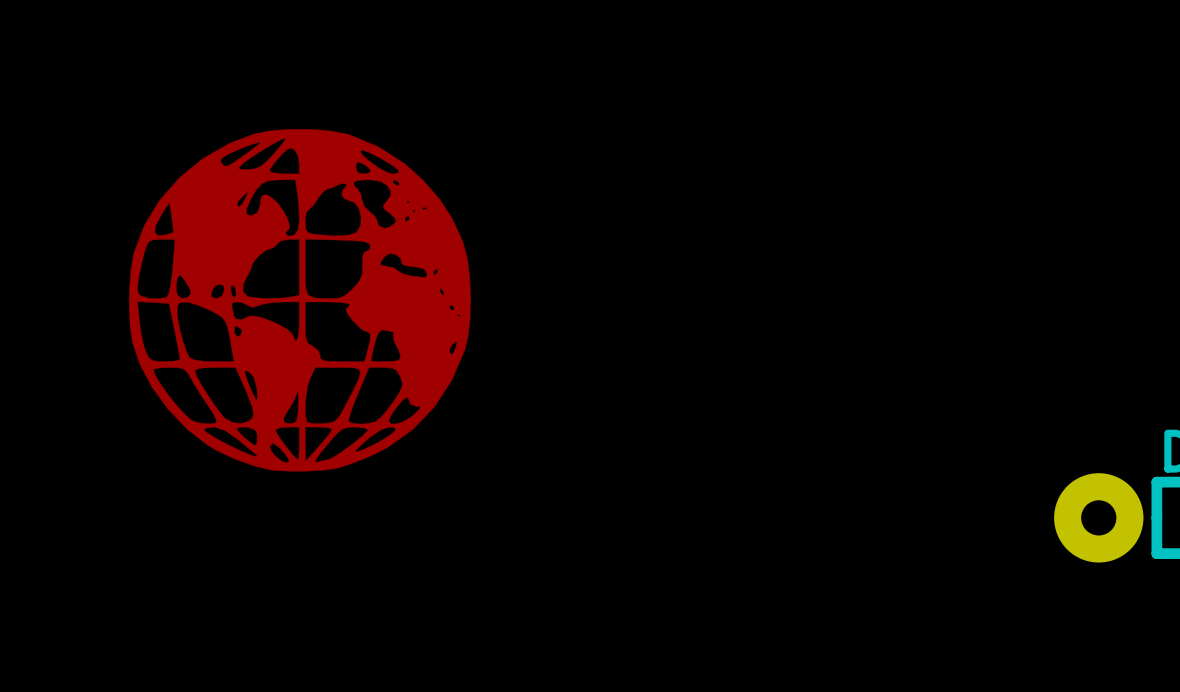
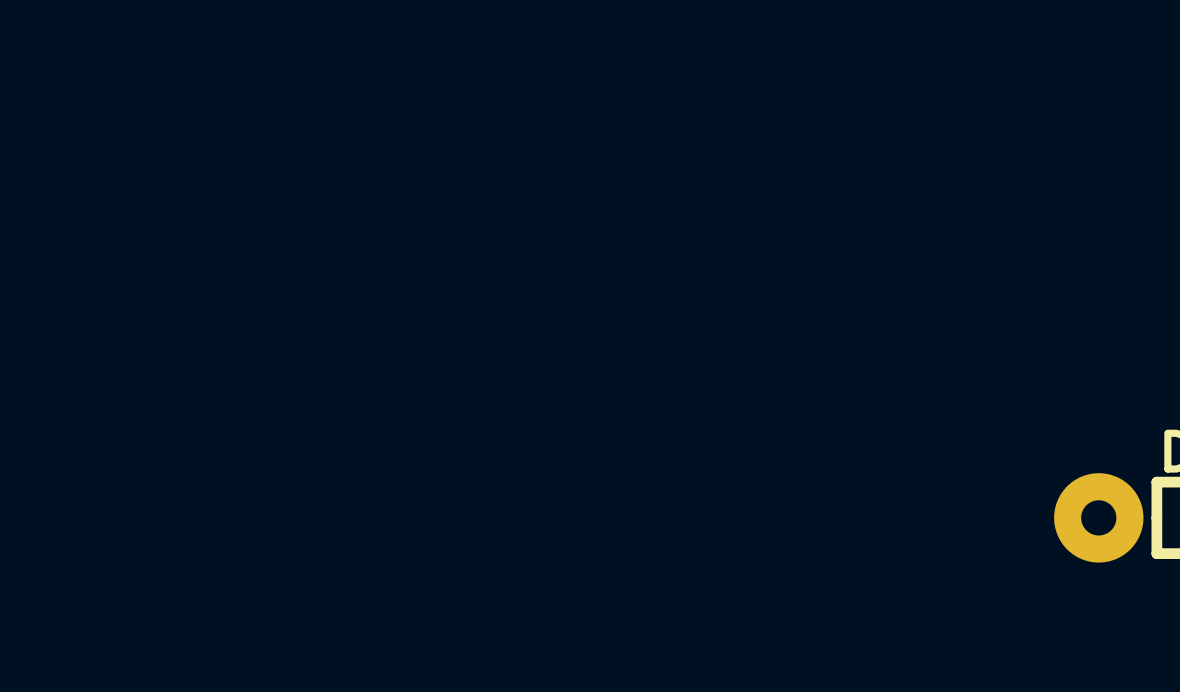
part: (300, 300) -> none

